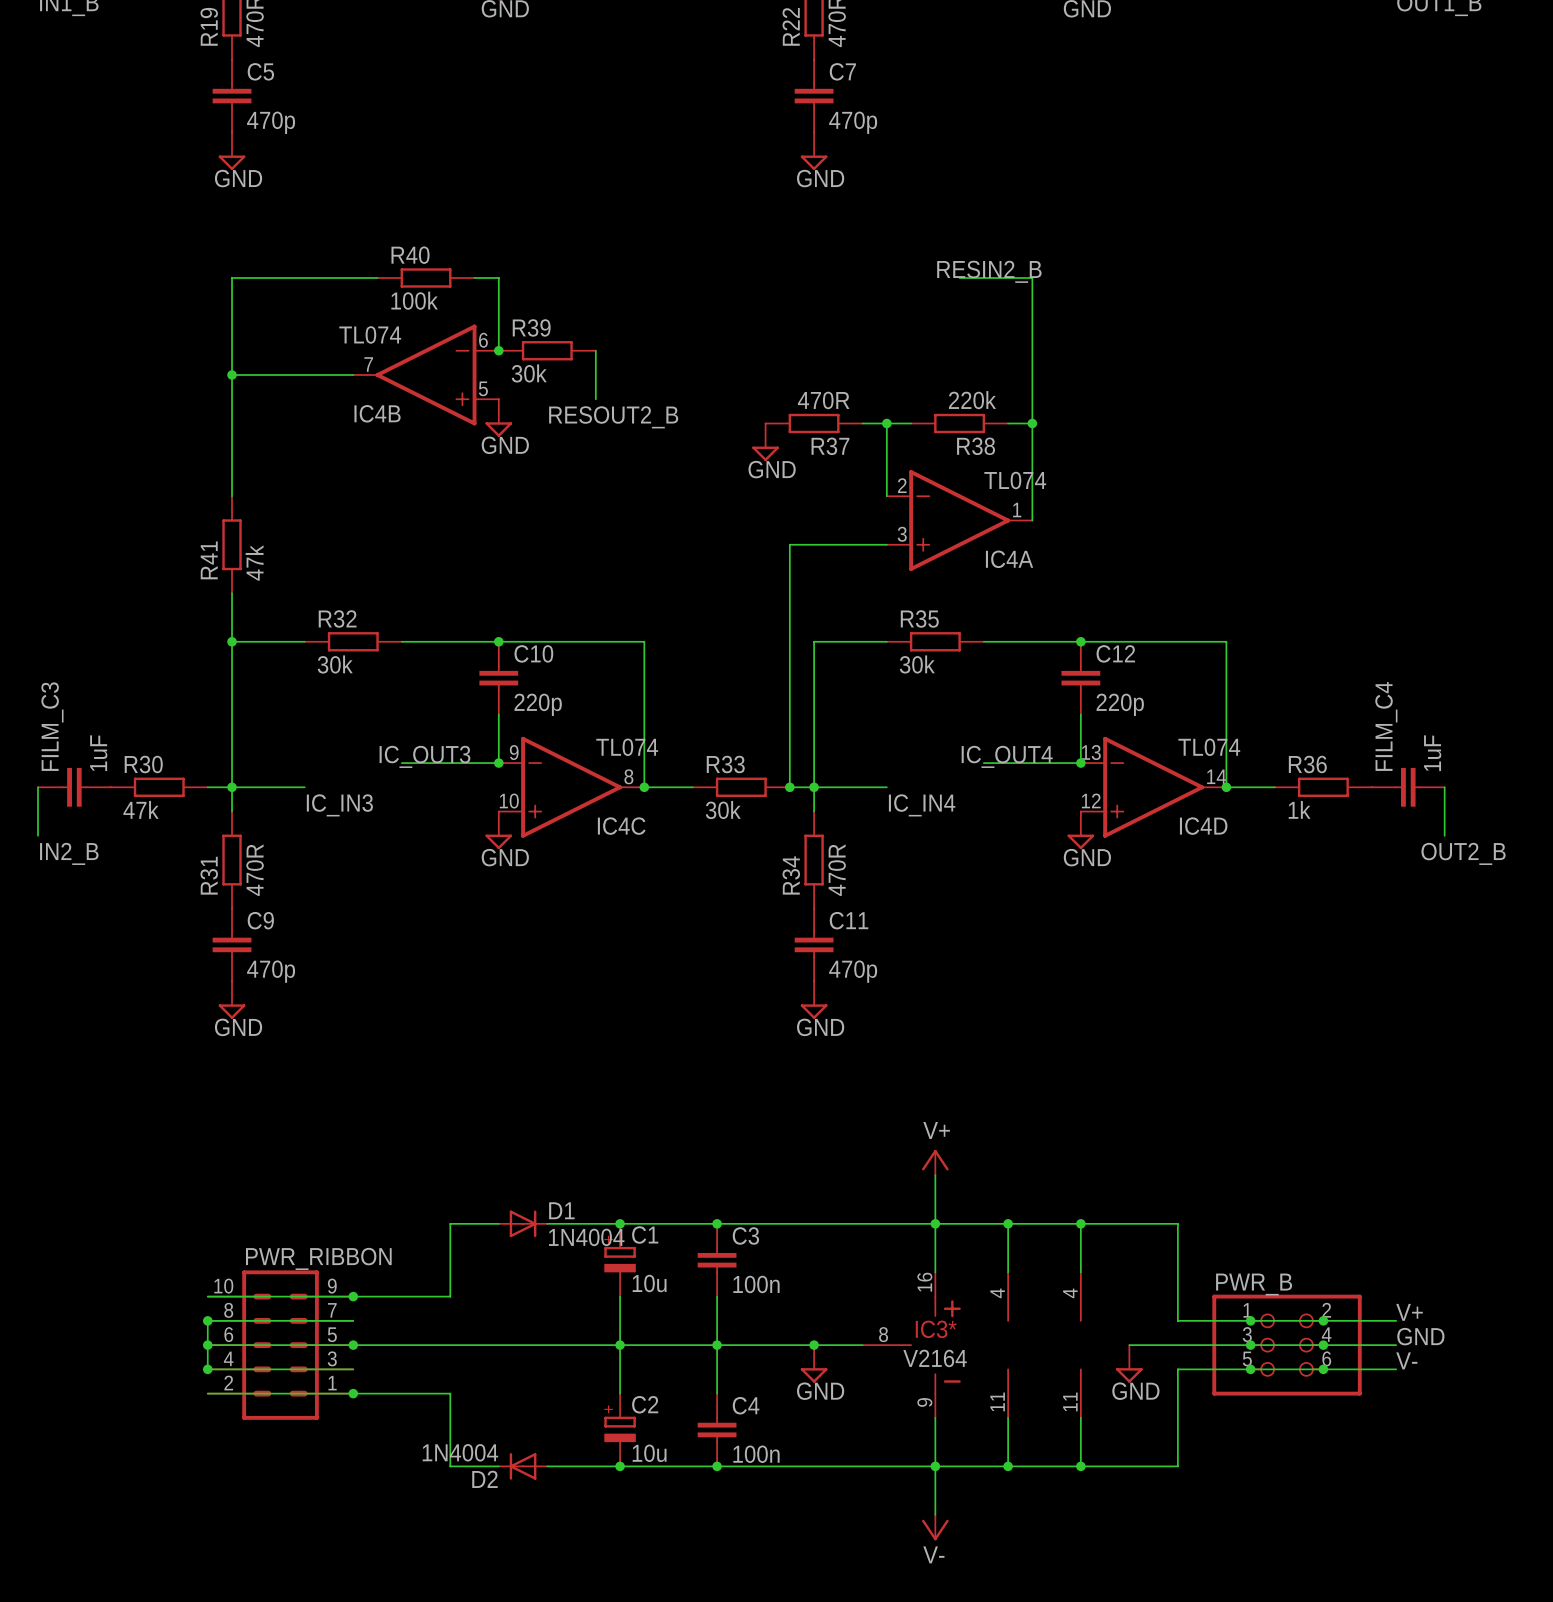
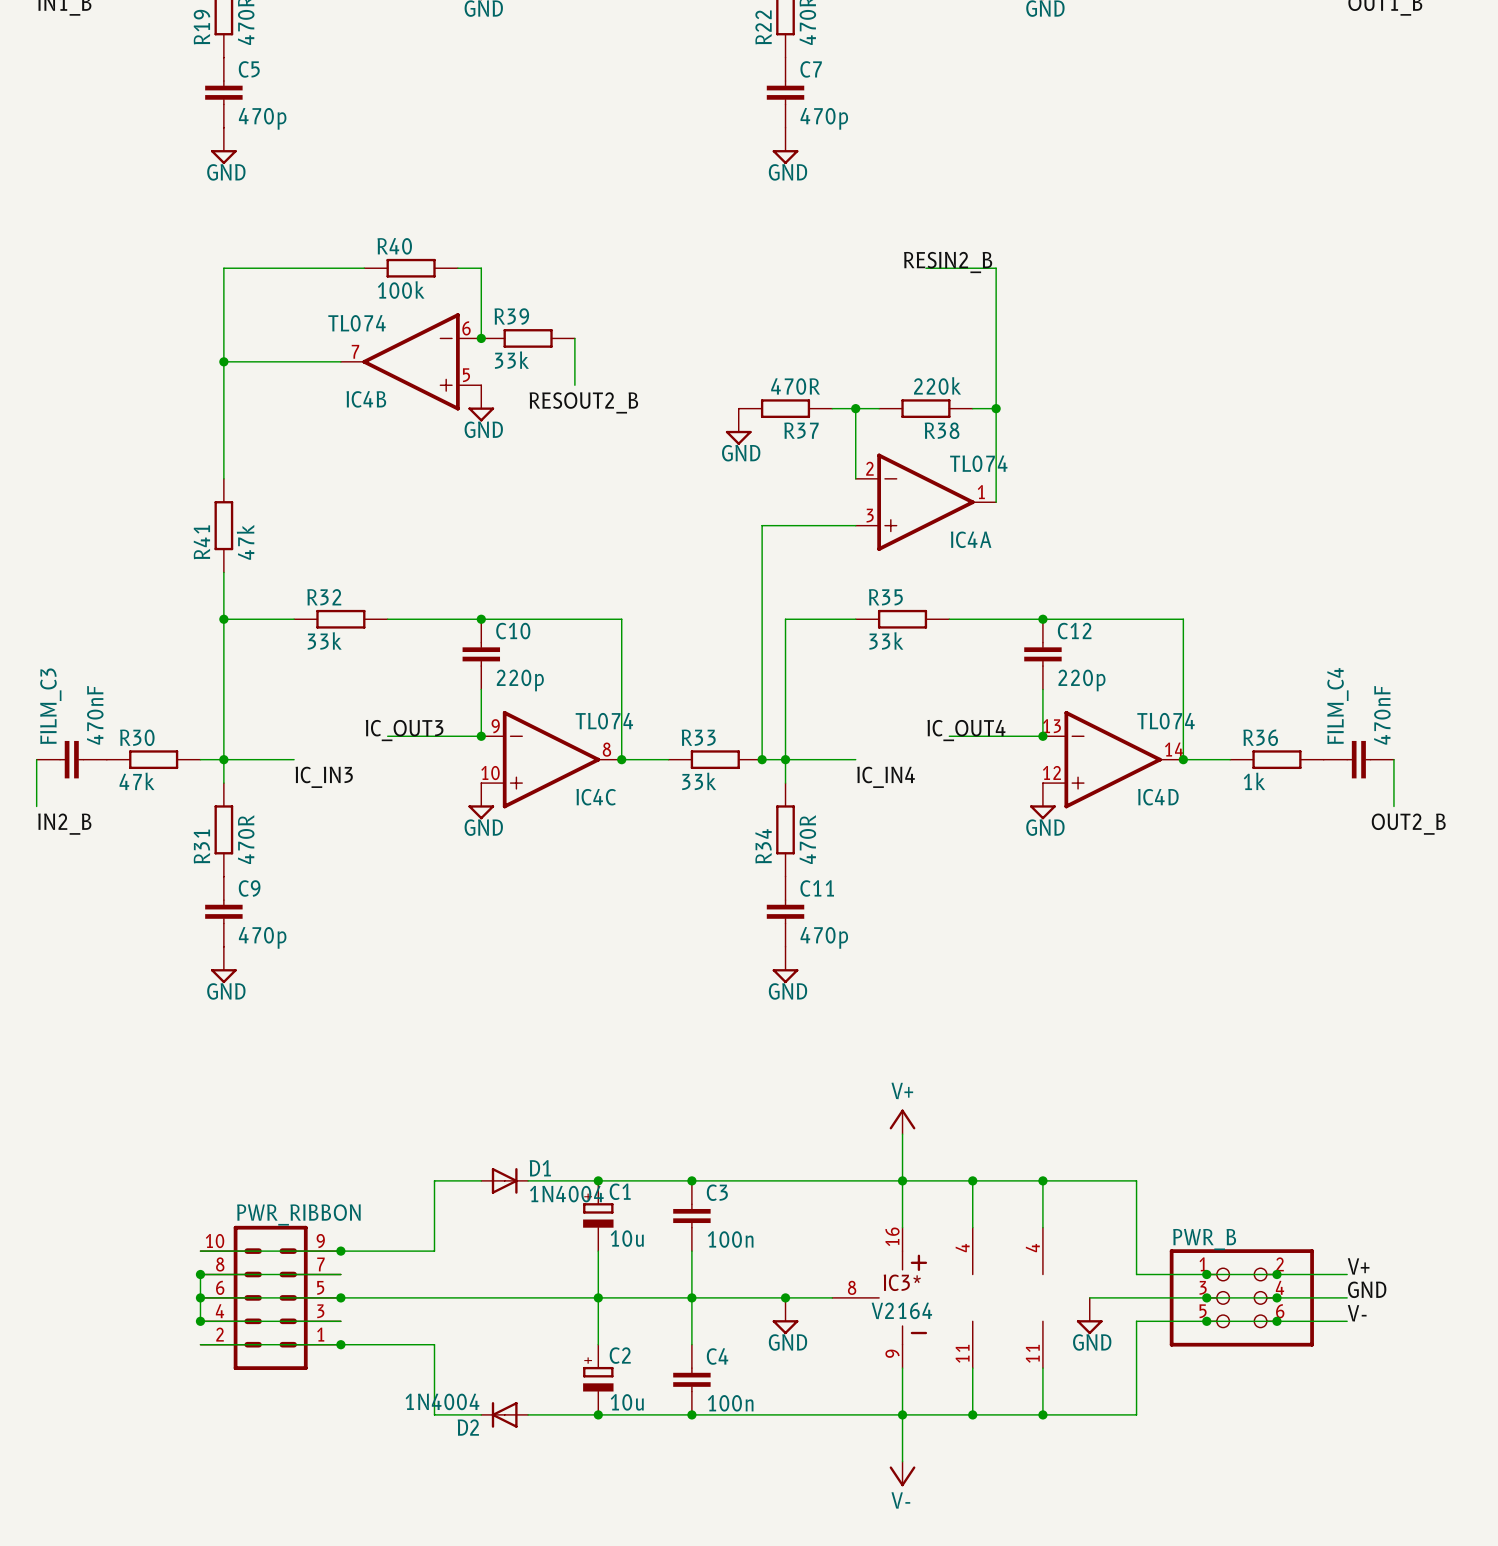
R39 value: 30k (529, 373) -> 33k (511, 360)
R32 value: 30k (335, 664) -> 33k (324, 640)
R35 value: 30k (917, 664) -> 33k (886, 640)
FILM_C3 value: 1uF (98, 753) -> 470nF (95, 715)
FILM_C4 value: 1uF (1432, 753) -> 470nF (1382, 715)
R33 value: 30k (723, 810) -> 33k (699, 781)

